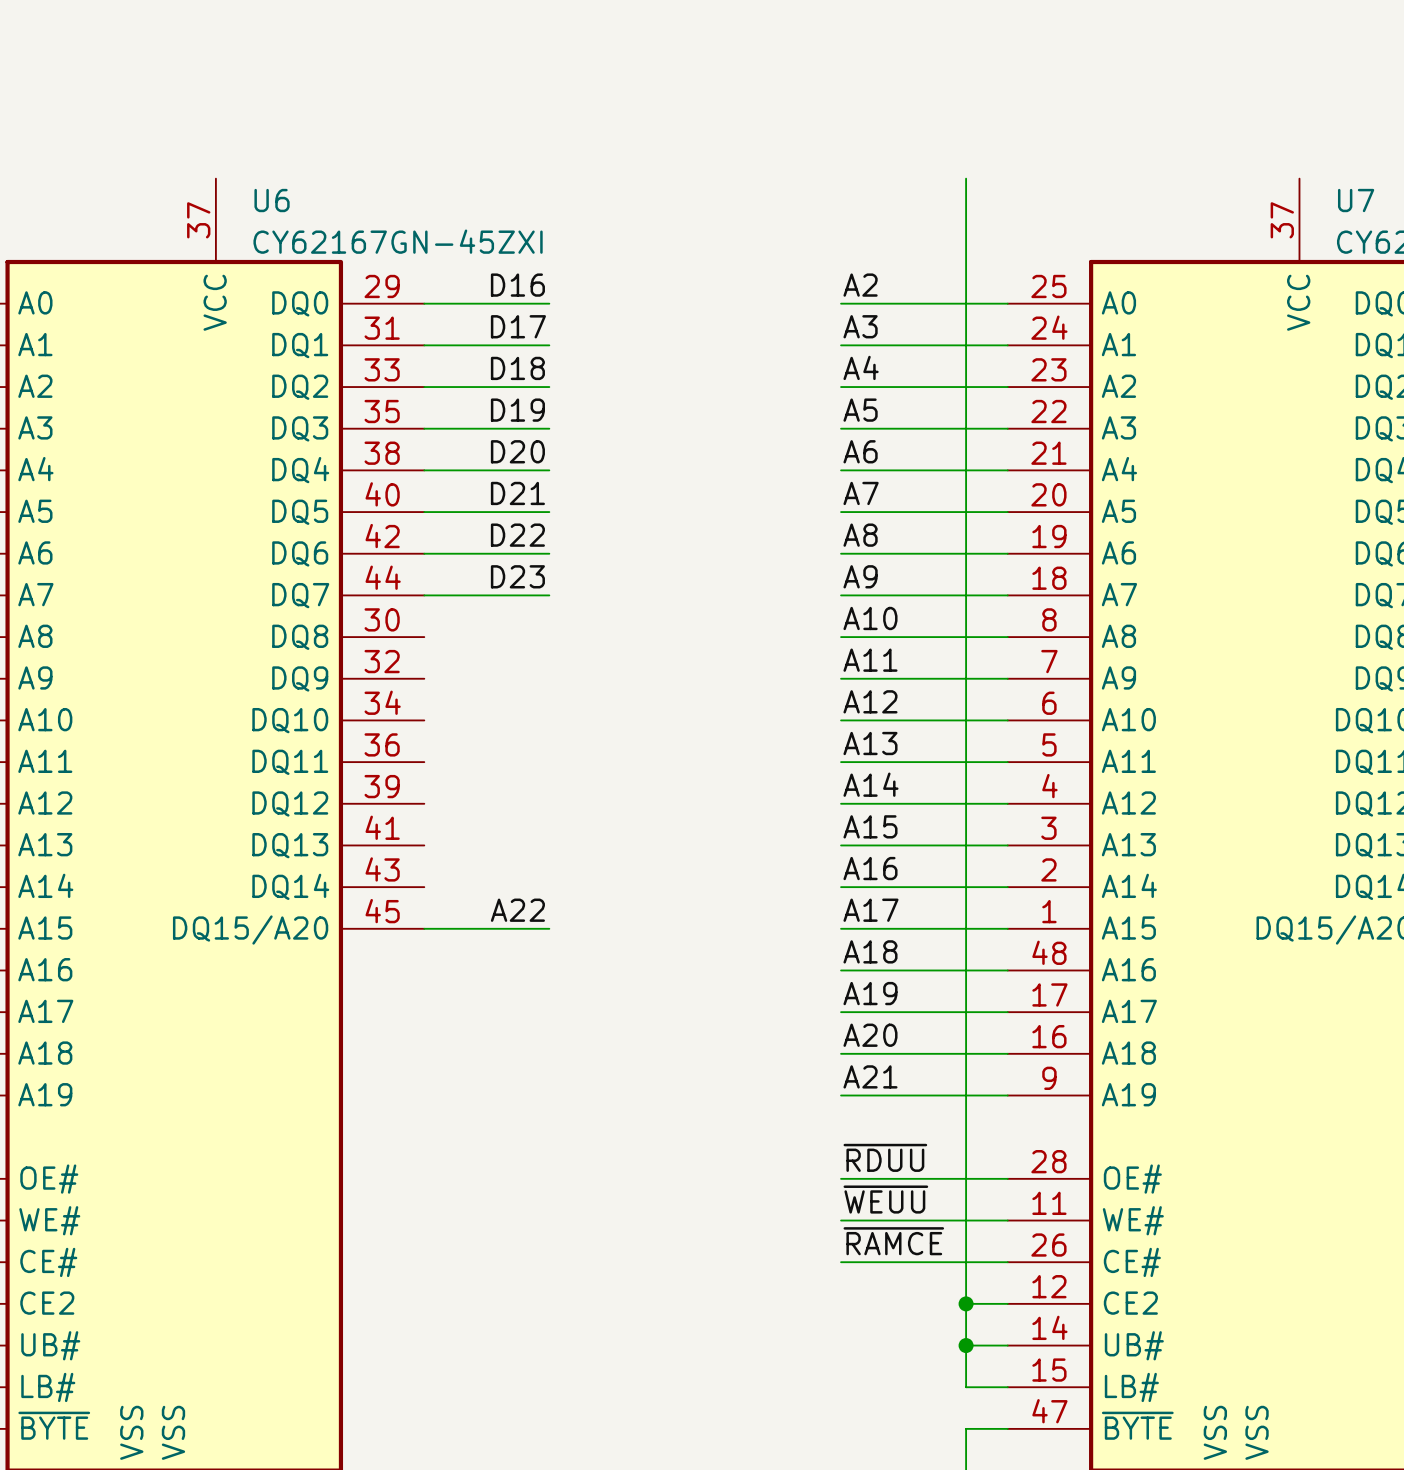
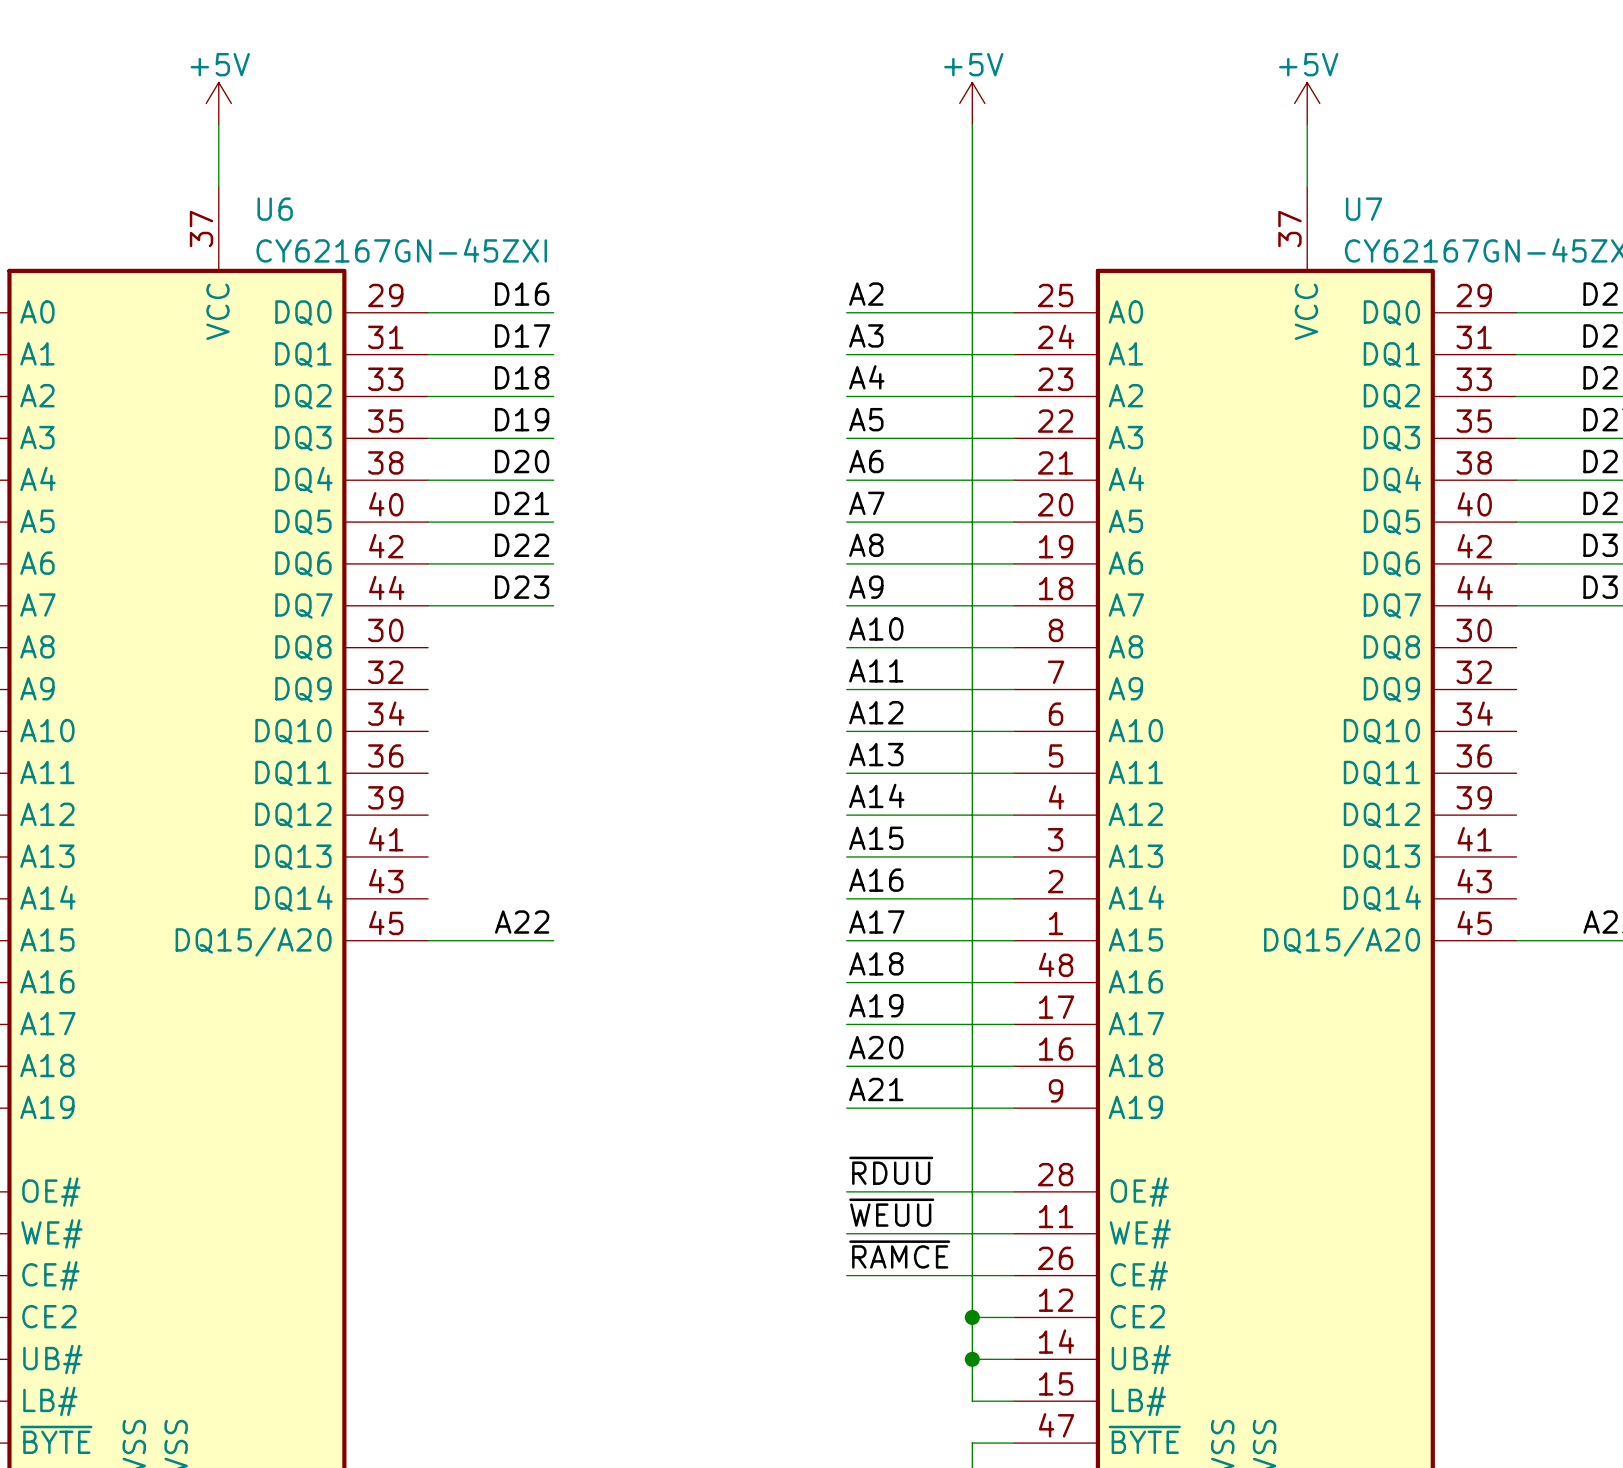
power symbol: none -> +5V (218, 103)
power symbol: none -> +5V (972, 103)
power symbol: none -> +5V (1307, 103)
wire: none -> (218, 124) (218, 187)
wire: none -> (972, 124) (972, 187)
wire: none -> (1307, 124) (1307, 187)

